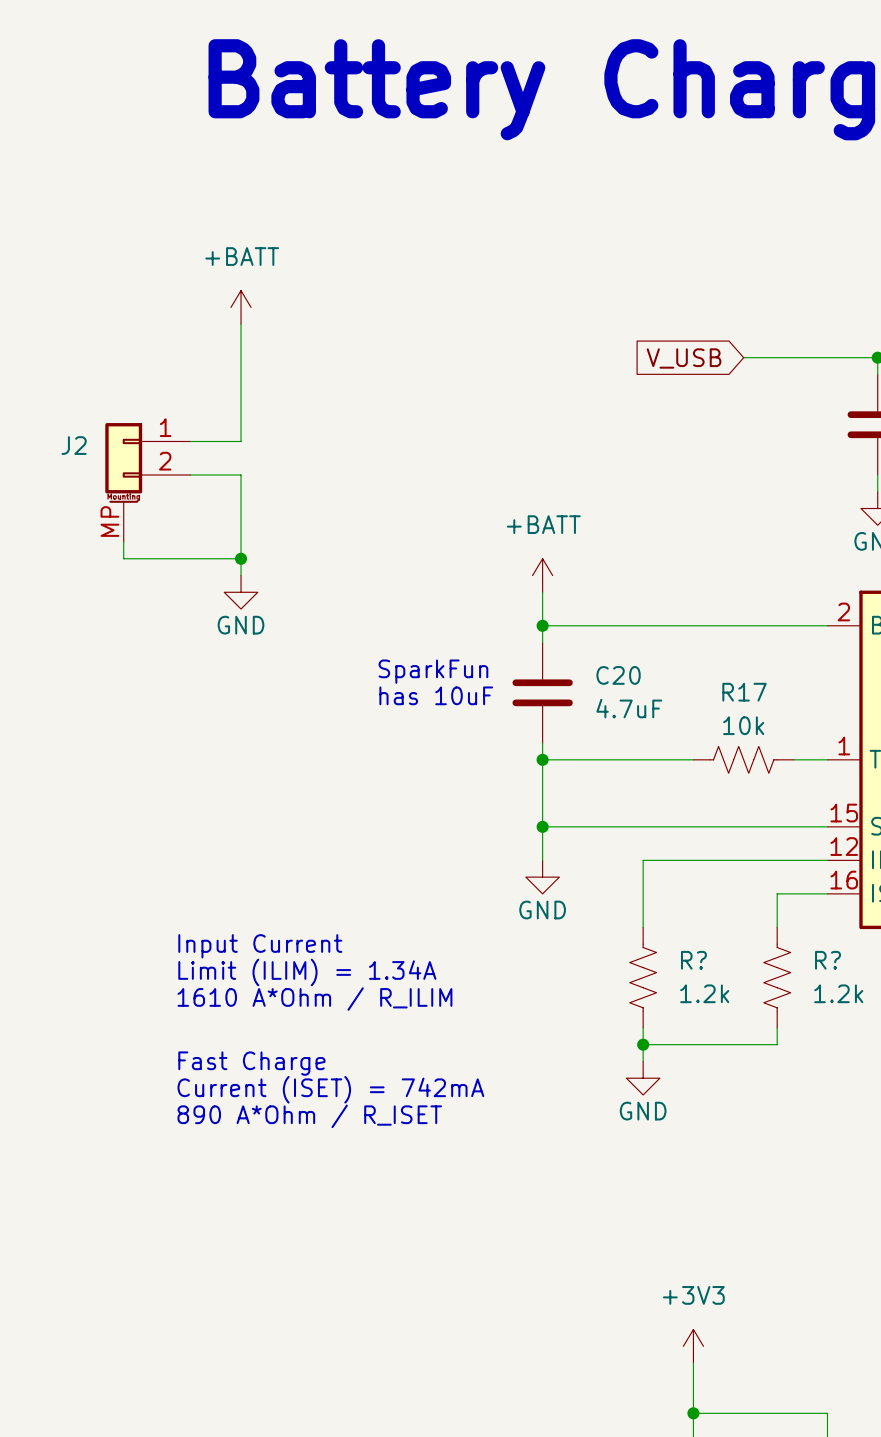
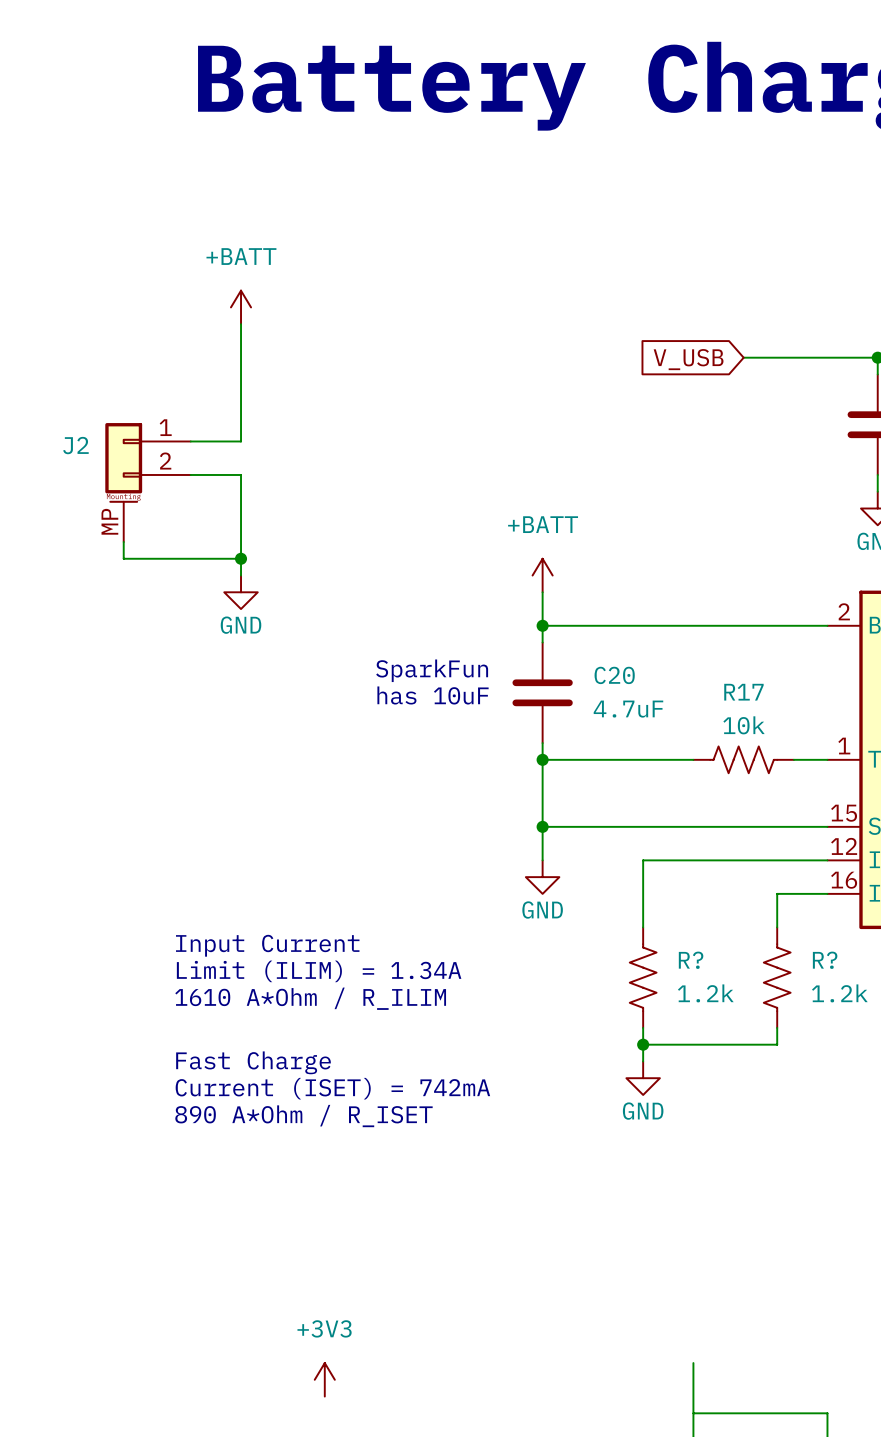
power symbol: +3V3 (693, 1346) -> none
power symbol: none -> +3V3 (324, 1379)
junction: (693, 1413) -> none

